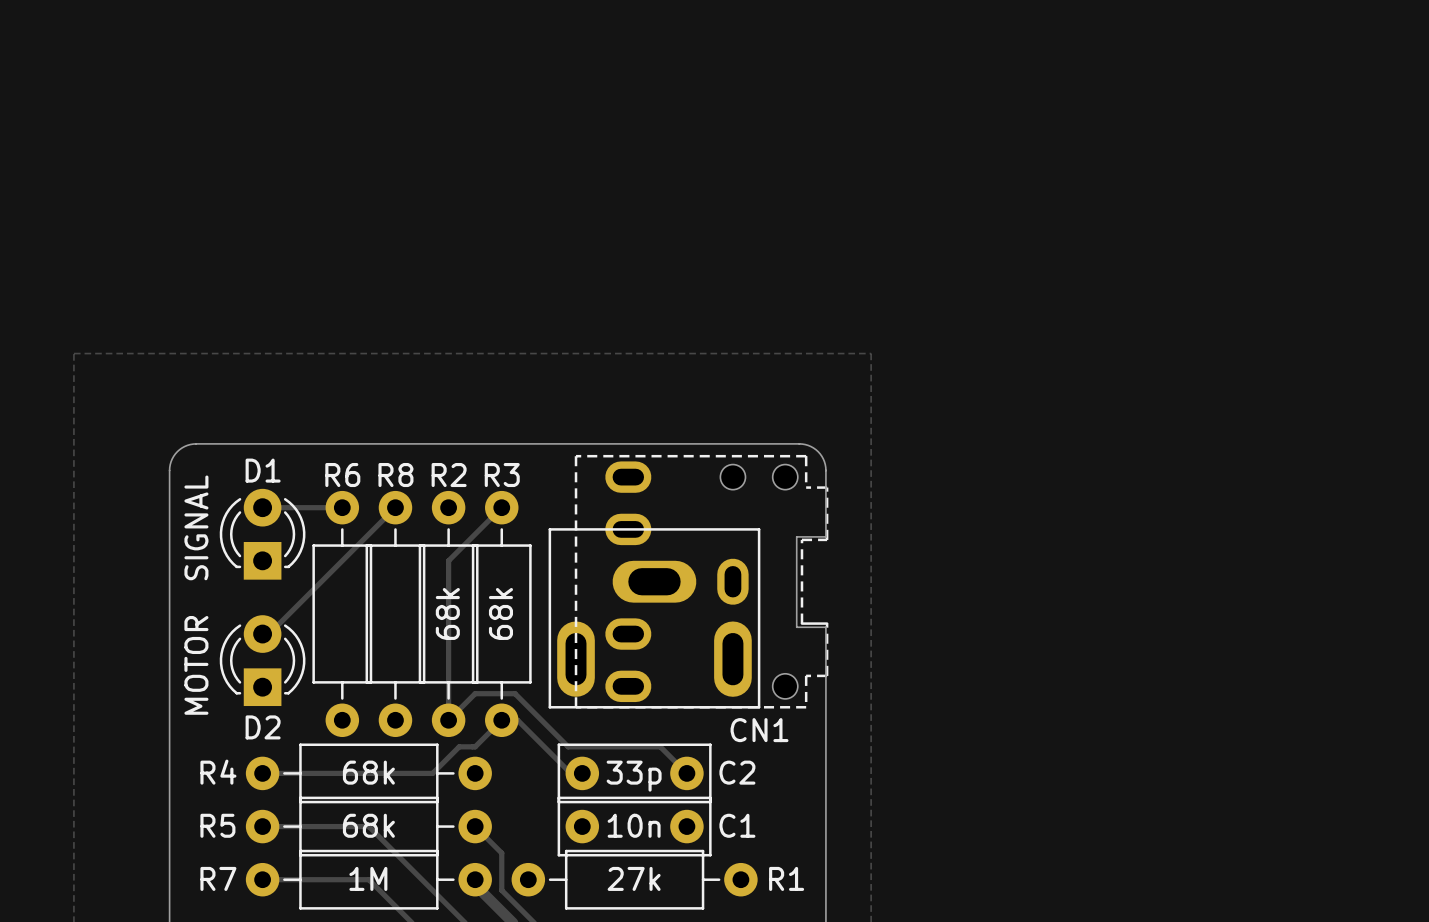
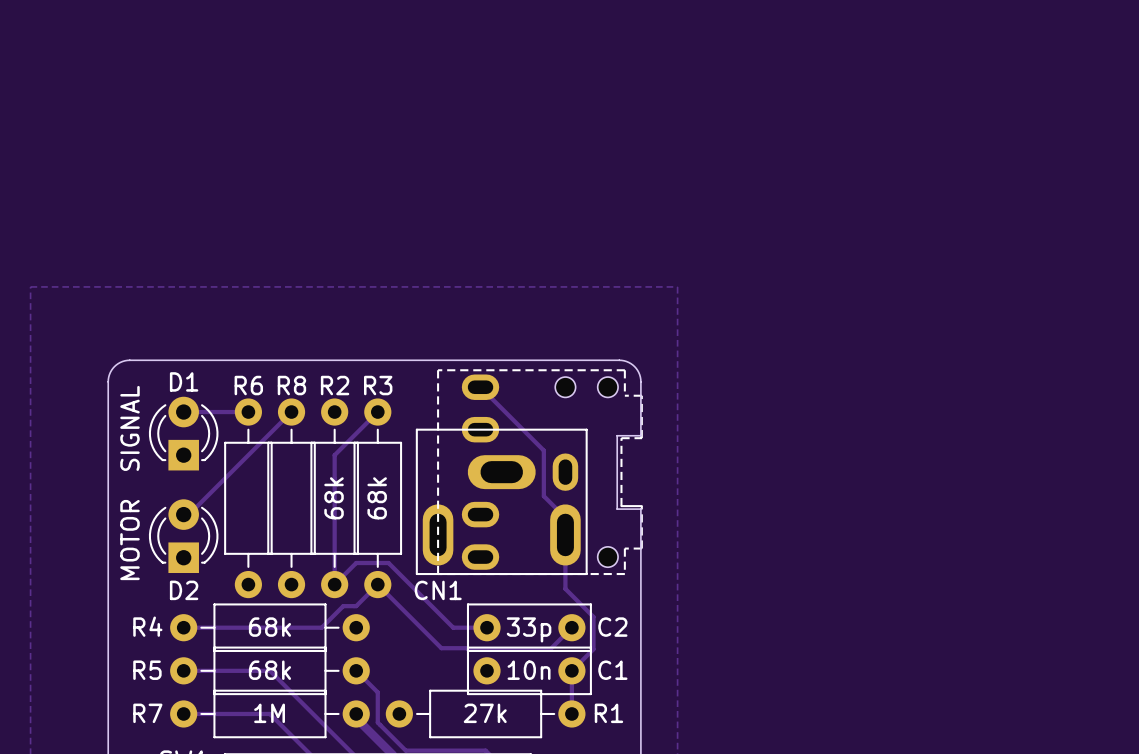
track: none -> (480, 387) (543, 450) (543, 496) (565, 517) (565, 588) (593, 616) (593, 649) (571, 670) (571, 713)
track: (501, 720) (517, 720) (570, 773) (582, 773) -> (377, 584) (441, 648) (550, 649) (571, 627)
CN1 name position: CN1 (759, 730) -> CN1 (438, 590)
track: (568, 746) (660, 746) (686, 773) -> (431, 606) (453, 627) (486, 627)
C2 position: (634, 773) -> (529, 627)
C1 position: (634, 826) -> (529, 670)

